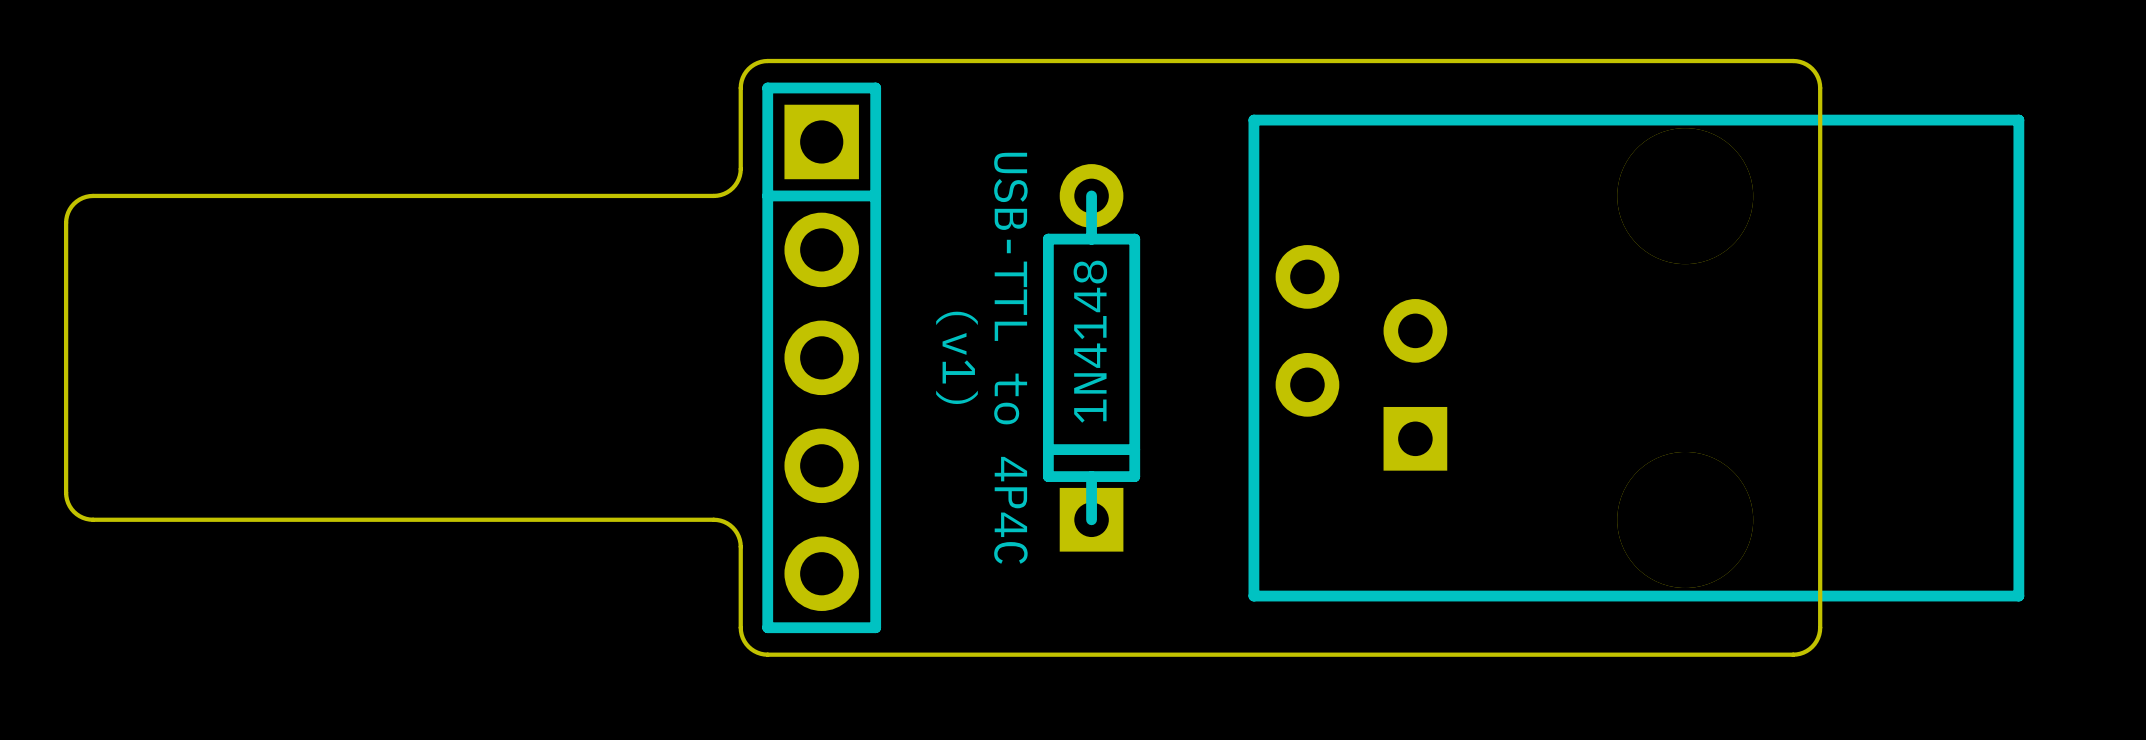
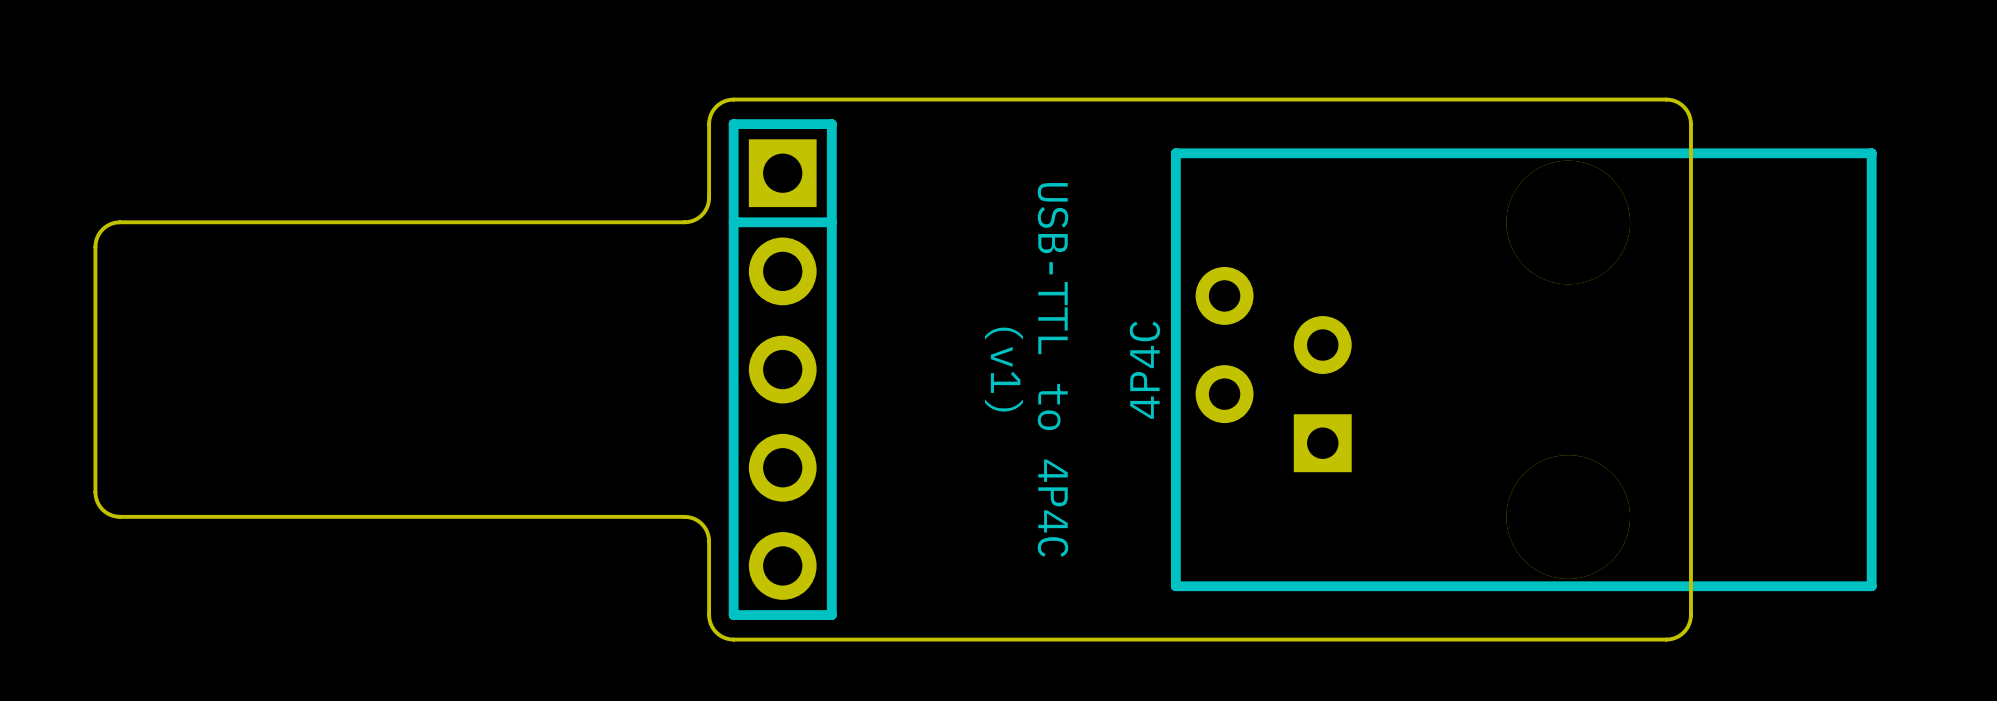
text position: (v1) (957, 357) -> (v1) (1003, 369)
part: 1N4148 (1091, 357) -> none
text position: USB-TTL to 4P4C (1010, 358) -> USB-TTL to 4P4C (1053, 369)
part value: none -> 4P4C (1144, 370)

